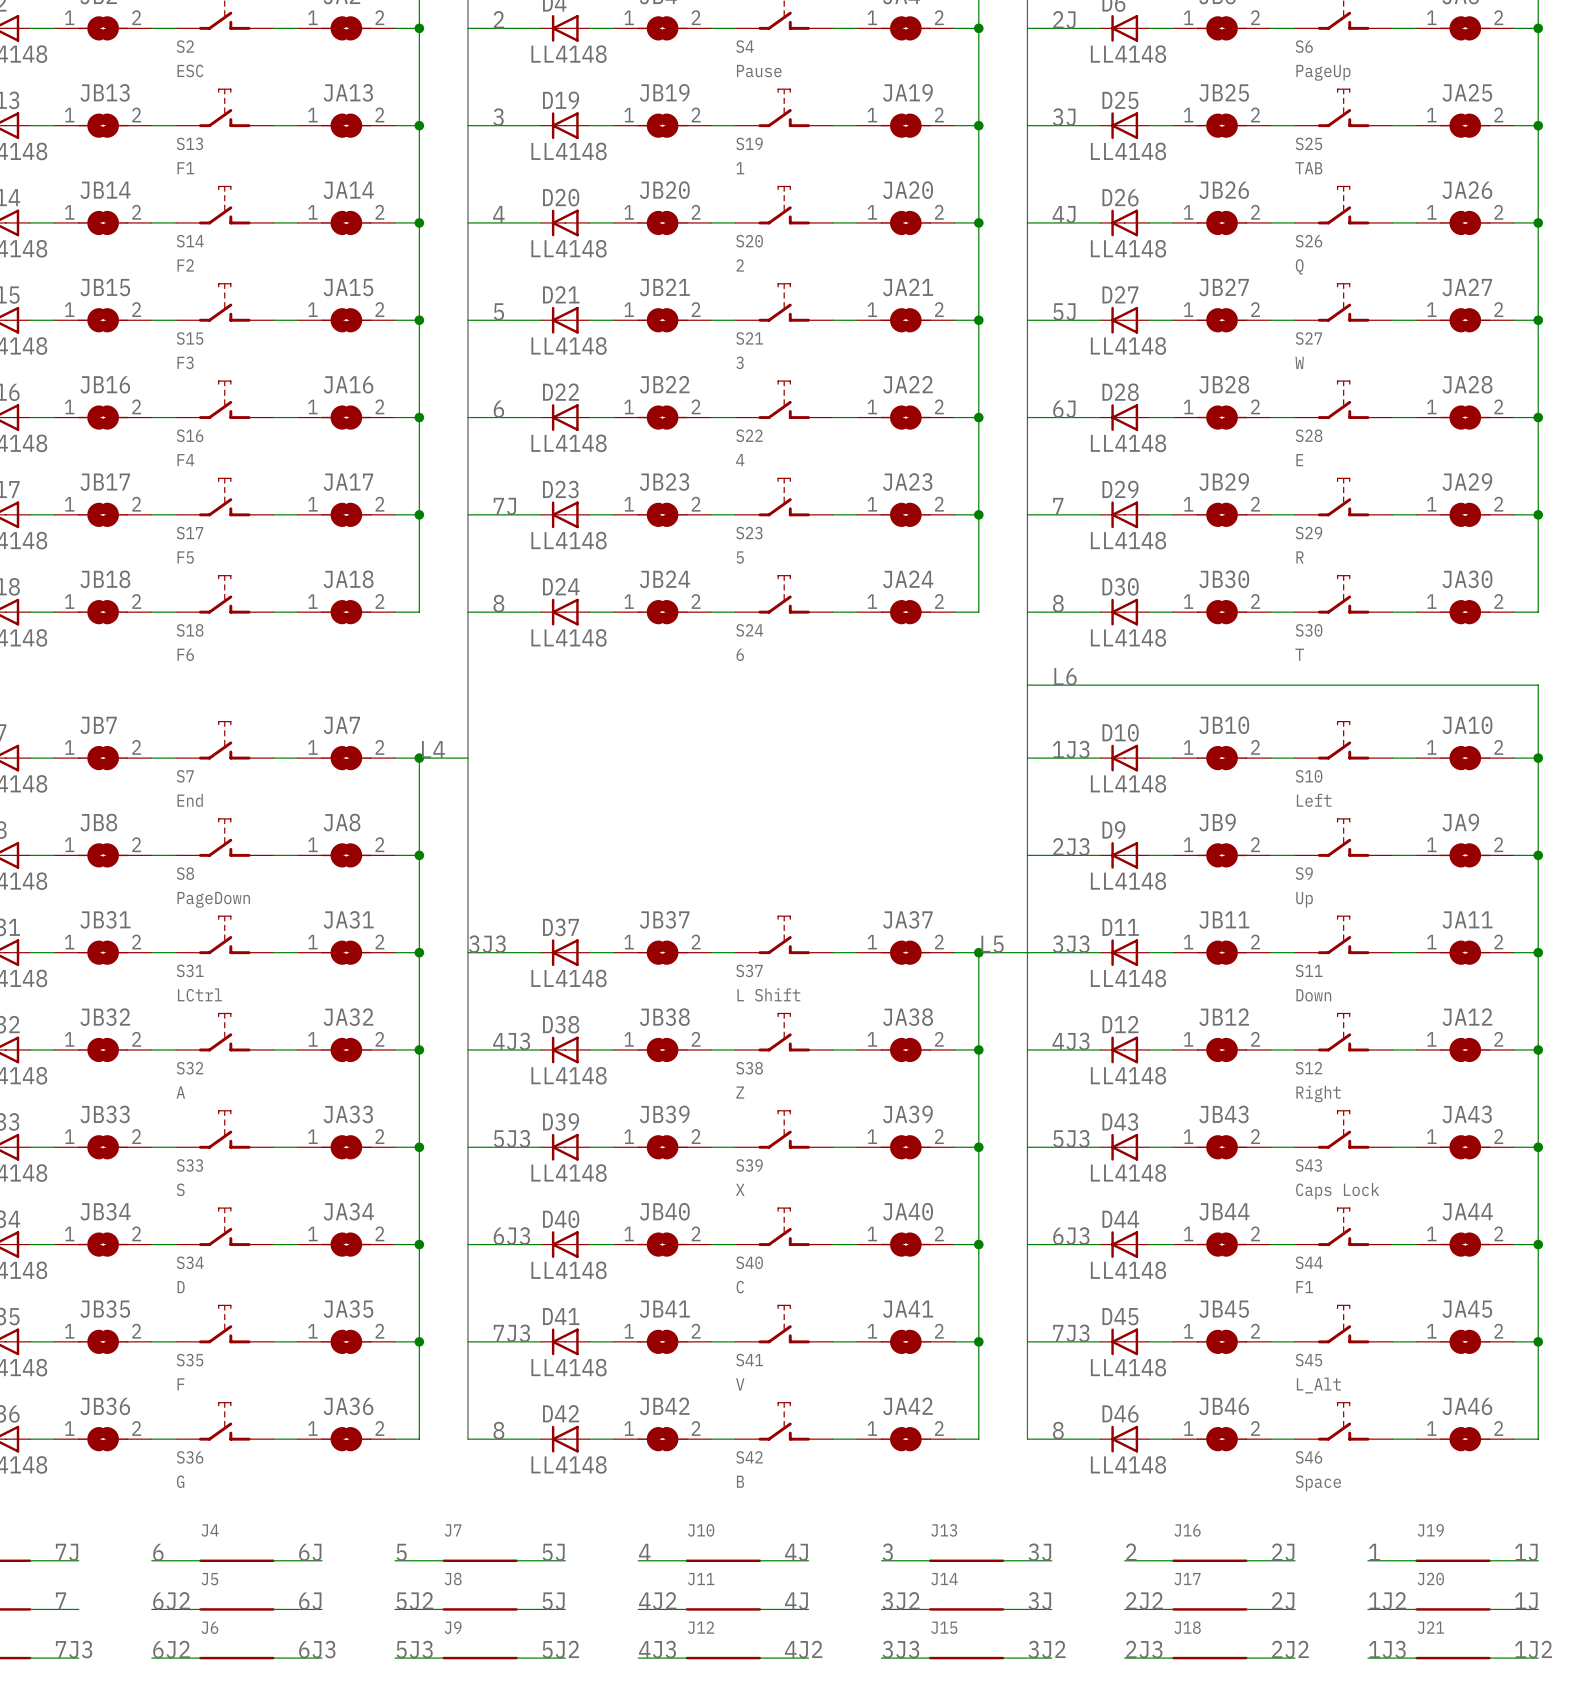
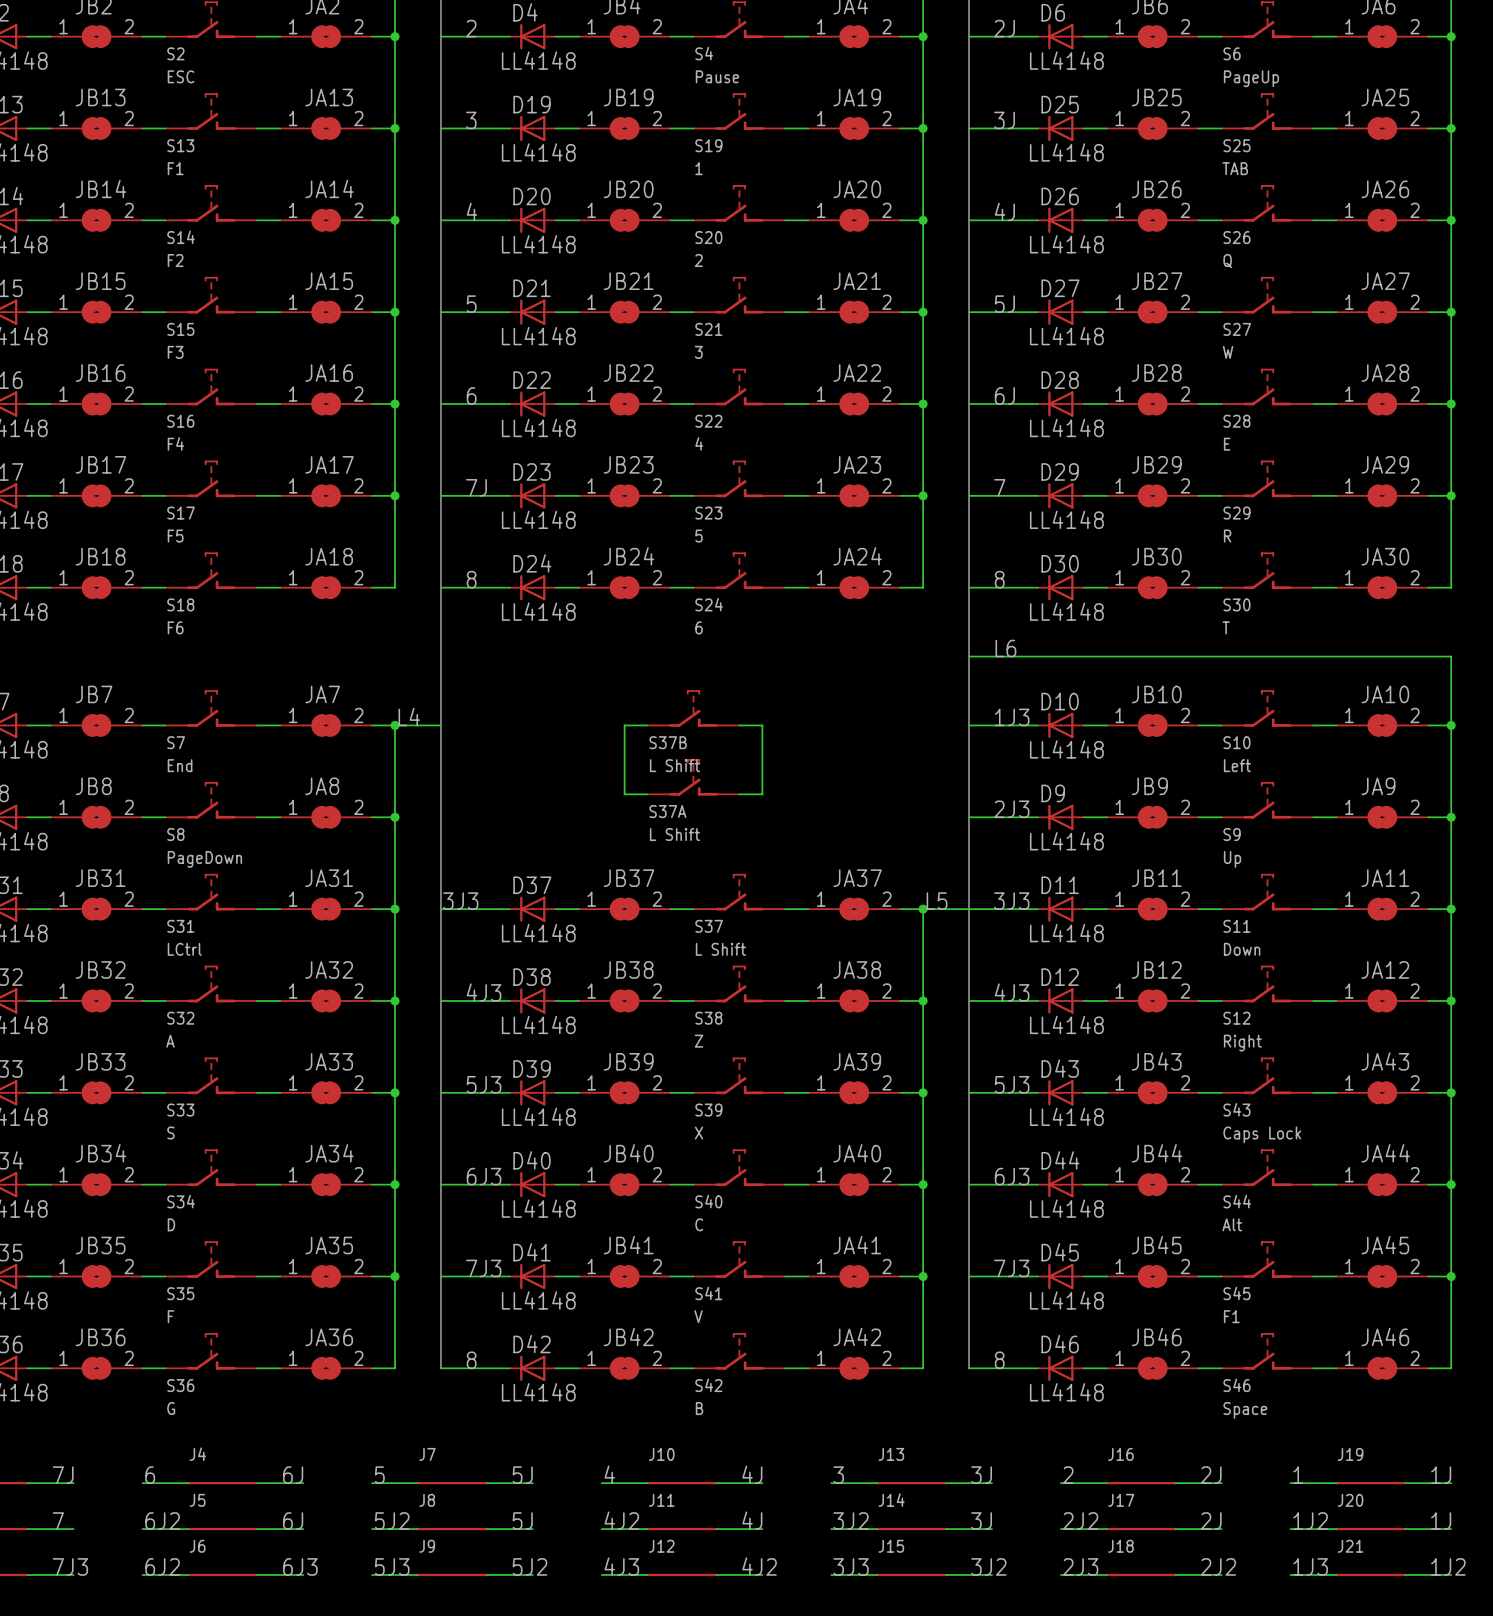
S37B: none -> L Shift (693, 708)
wire: none -> (647, 725) (624, 725) (624, 794) (647, 794)
wire: none -> (739, 725) (762, 725) (762, 794) (739, 794)
S37A: none -> L Shift (693, 777)
S44 value: F1 (1304, 1287) -> Alt (1232, 1224)
S45 value: L_Alt (1318, 1385) -> F1 (1231, 1316)

